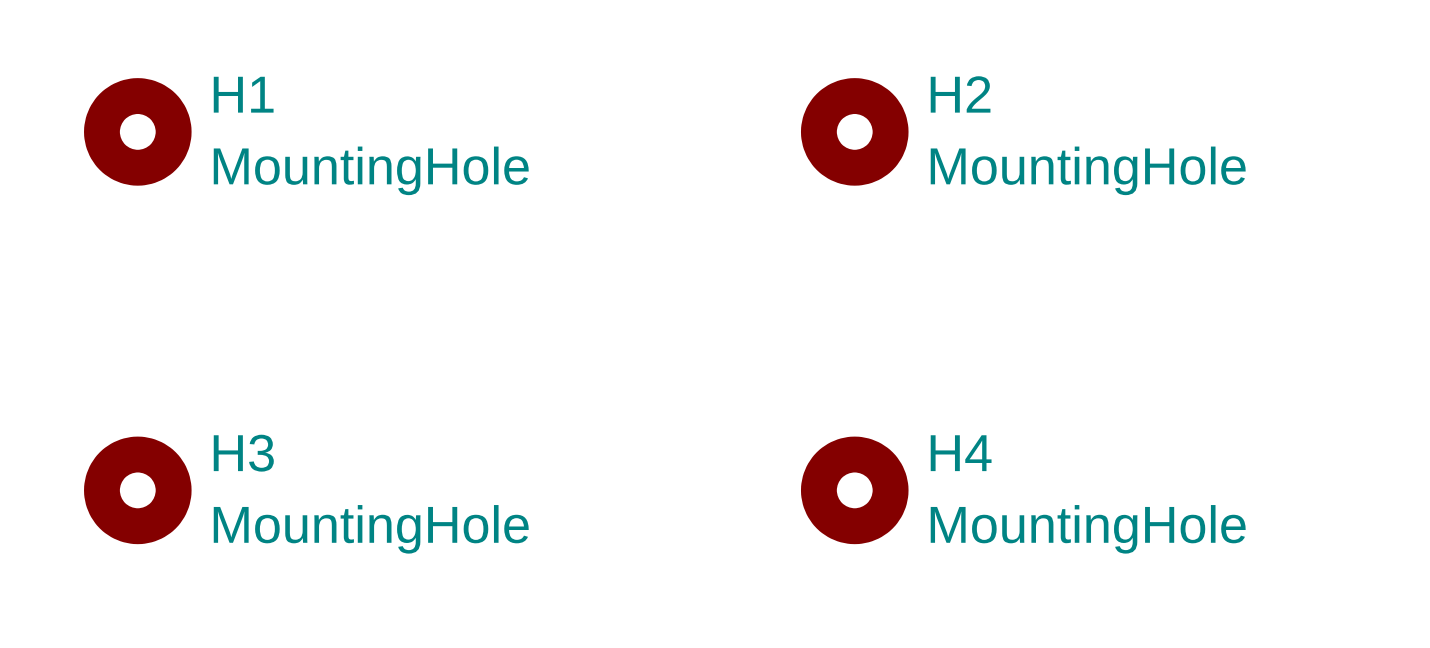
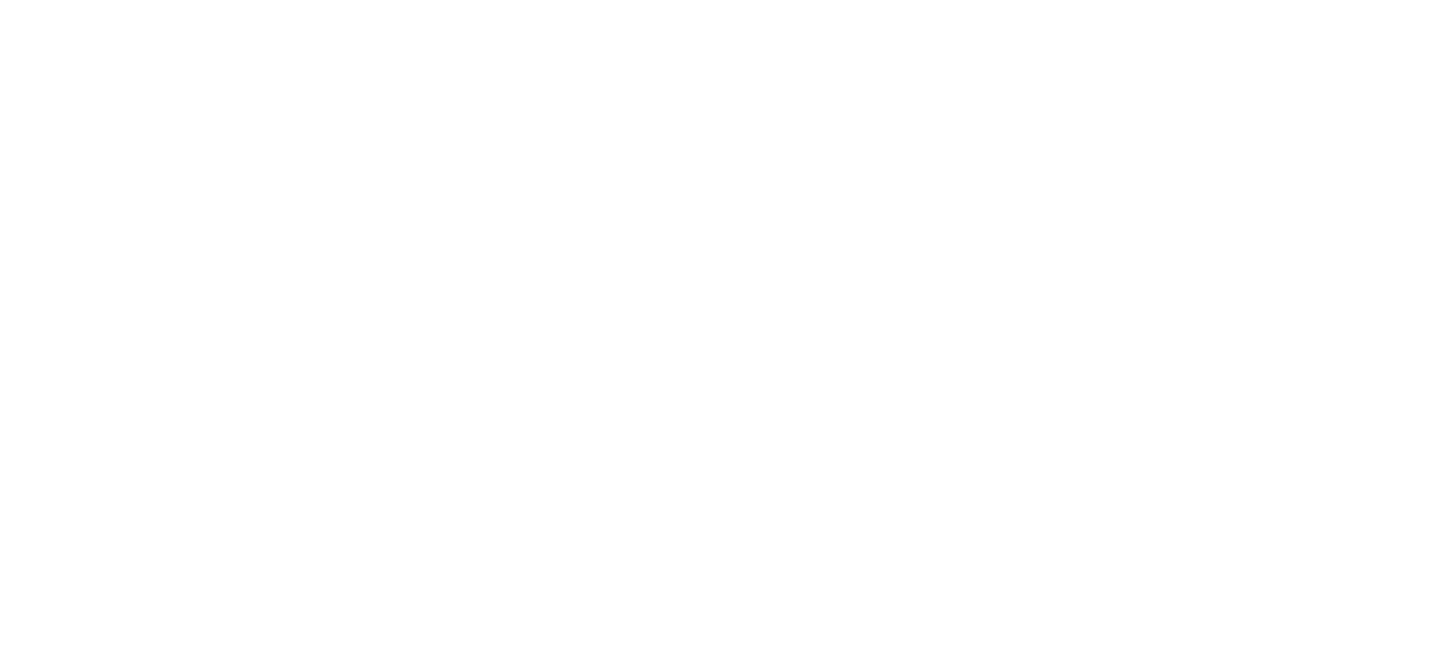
H1: MountingHole (137, 131) -> none
H2: MountingHole (854, 131) -> none
H3: MountingHole (137, 490) -> none
H4: MountingHole (854, 490) -> none

